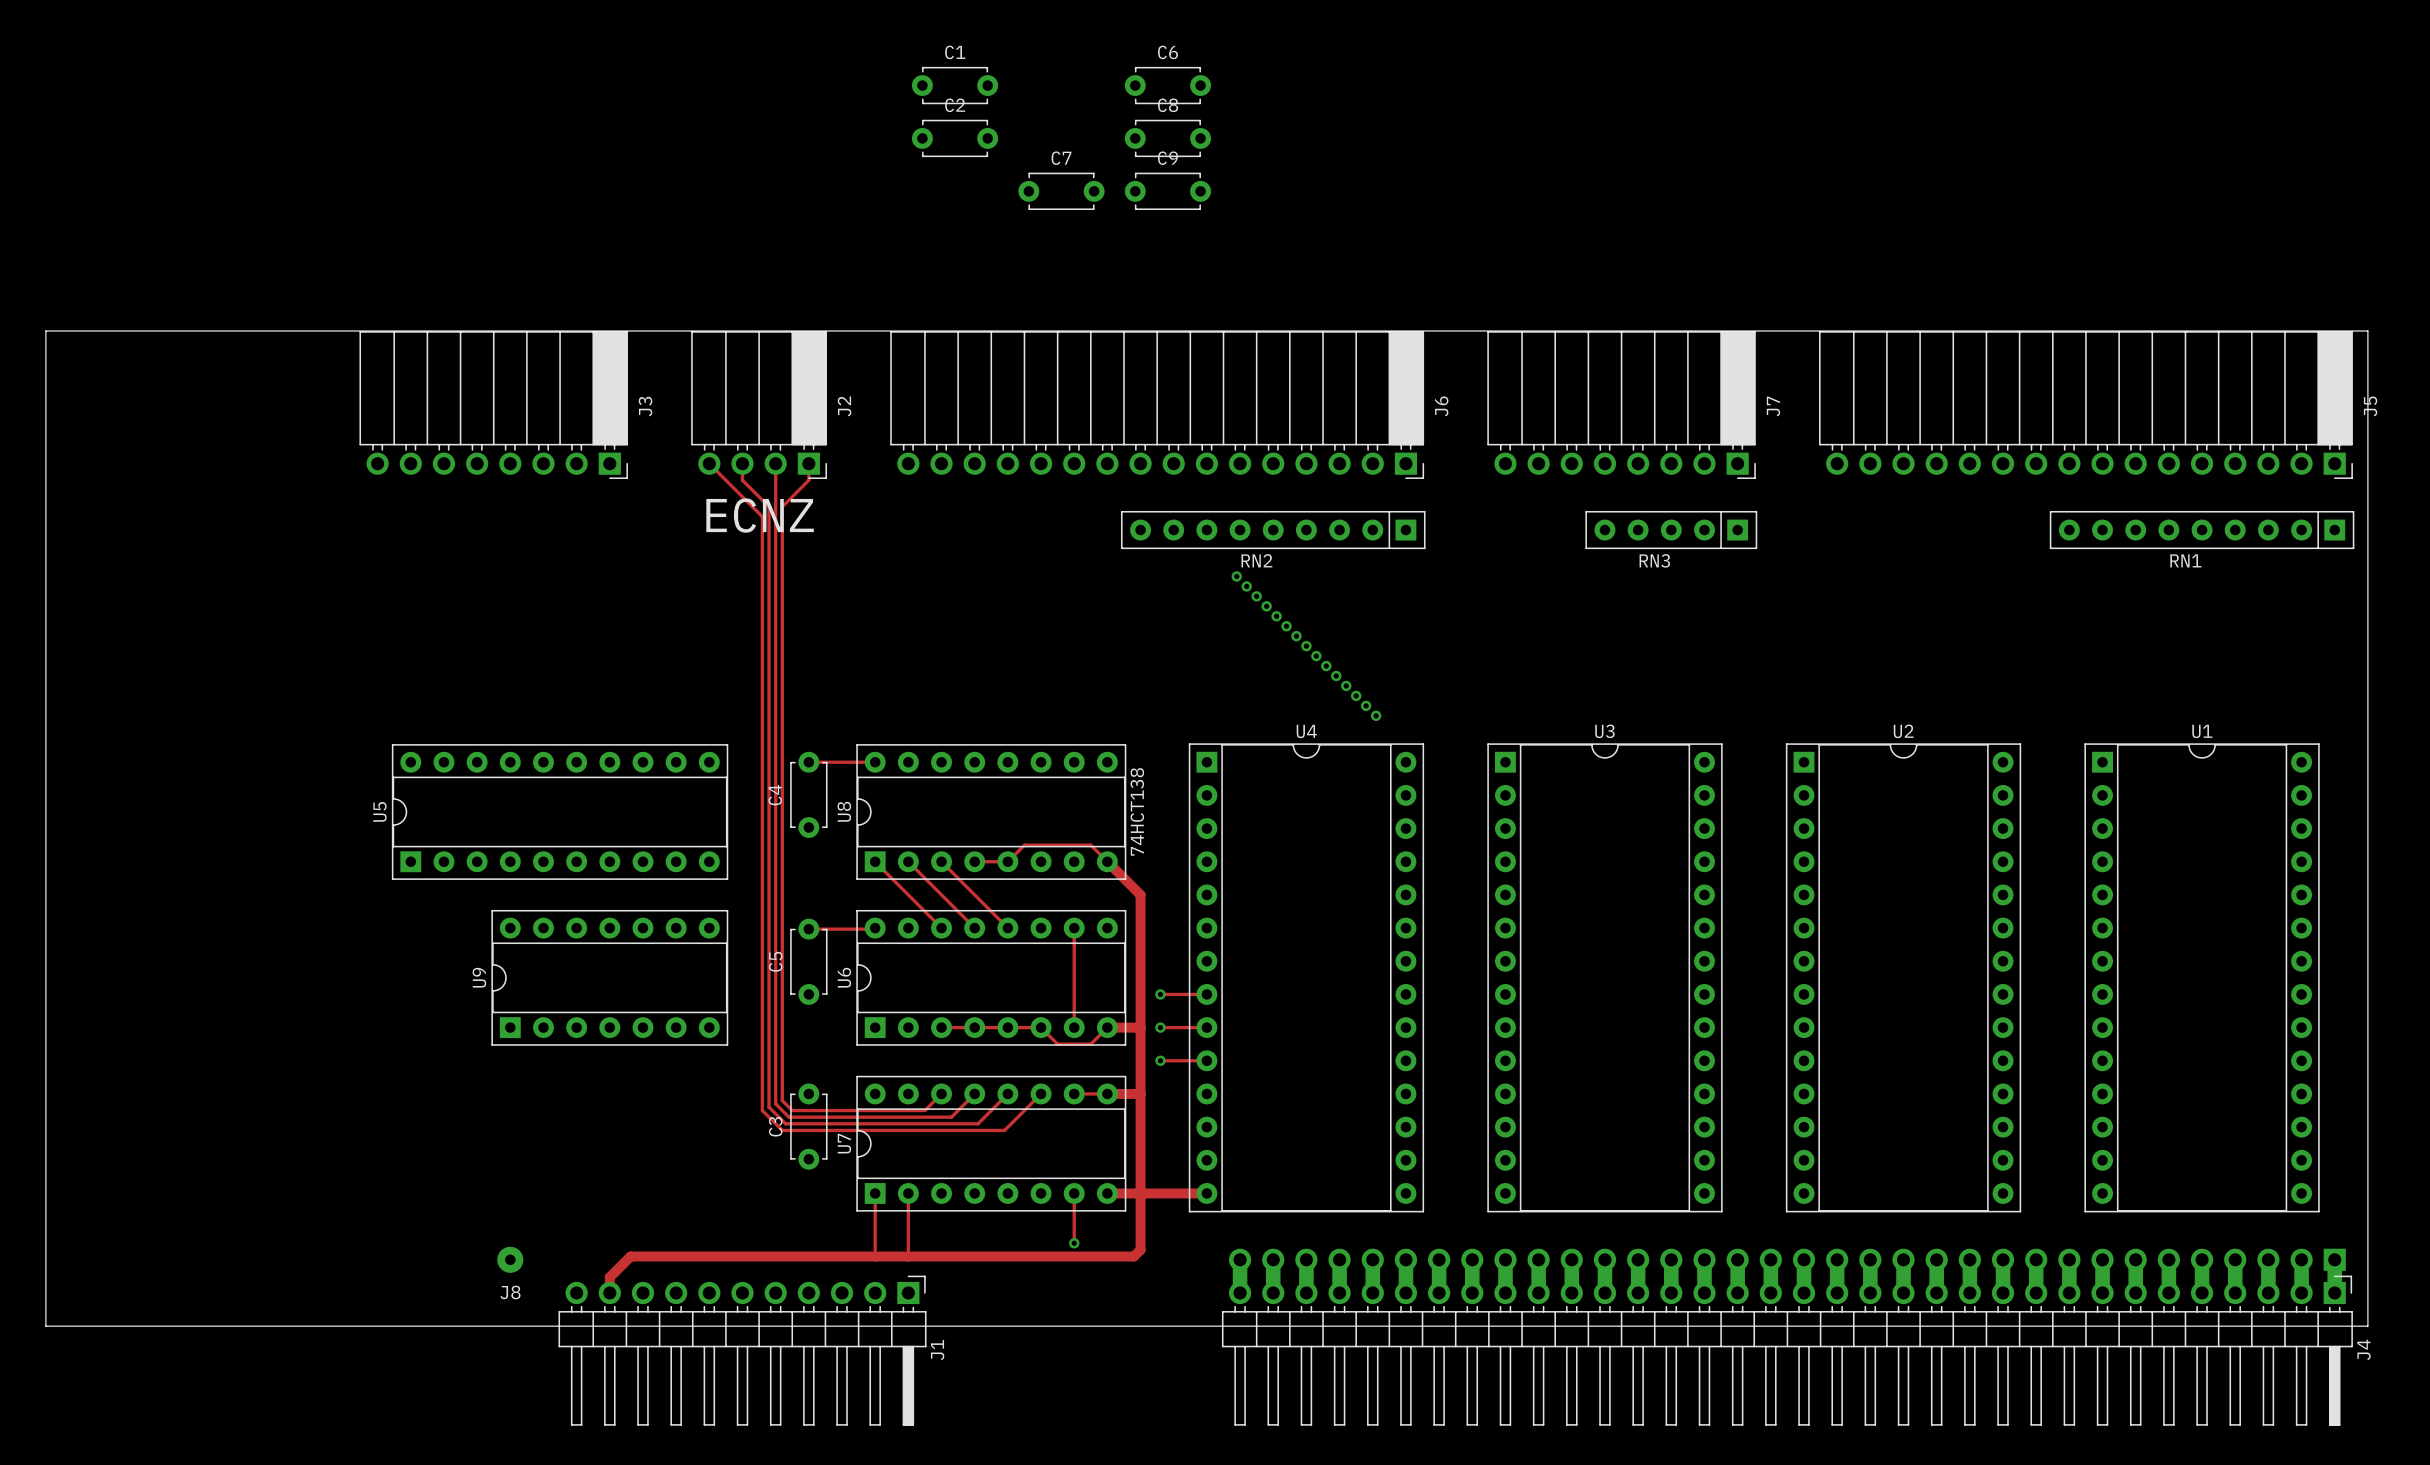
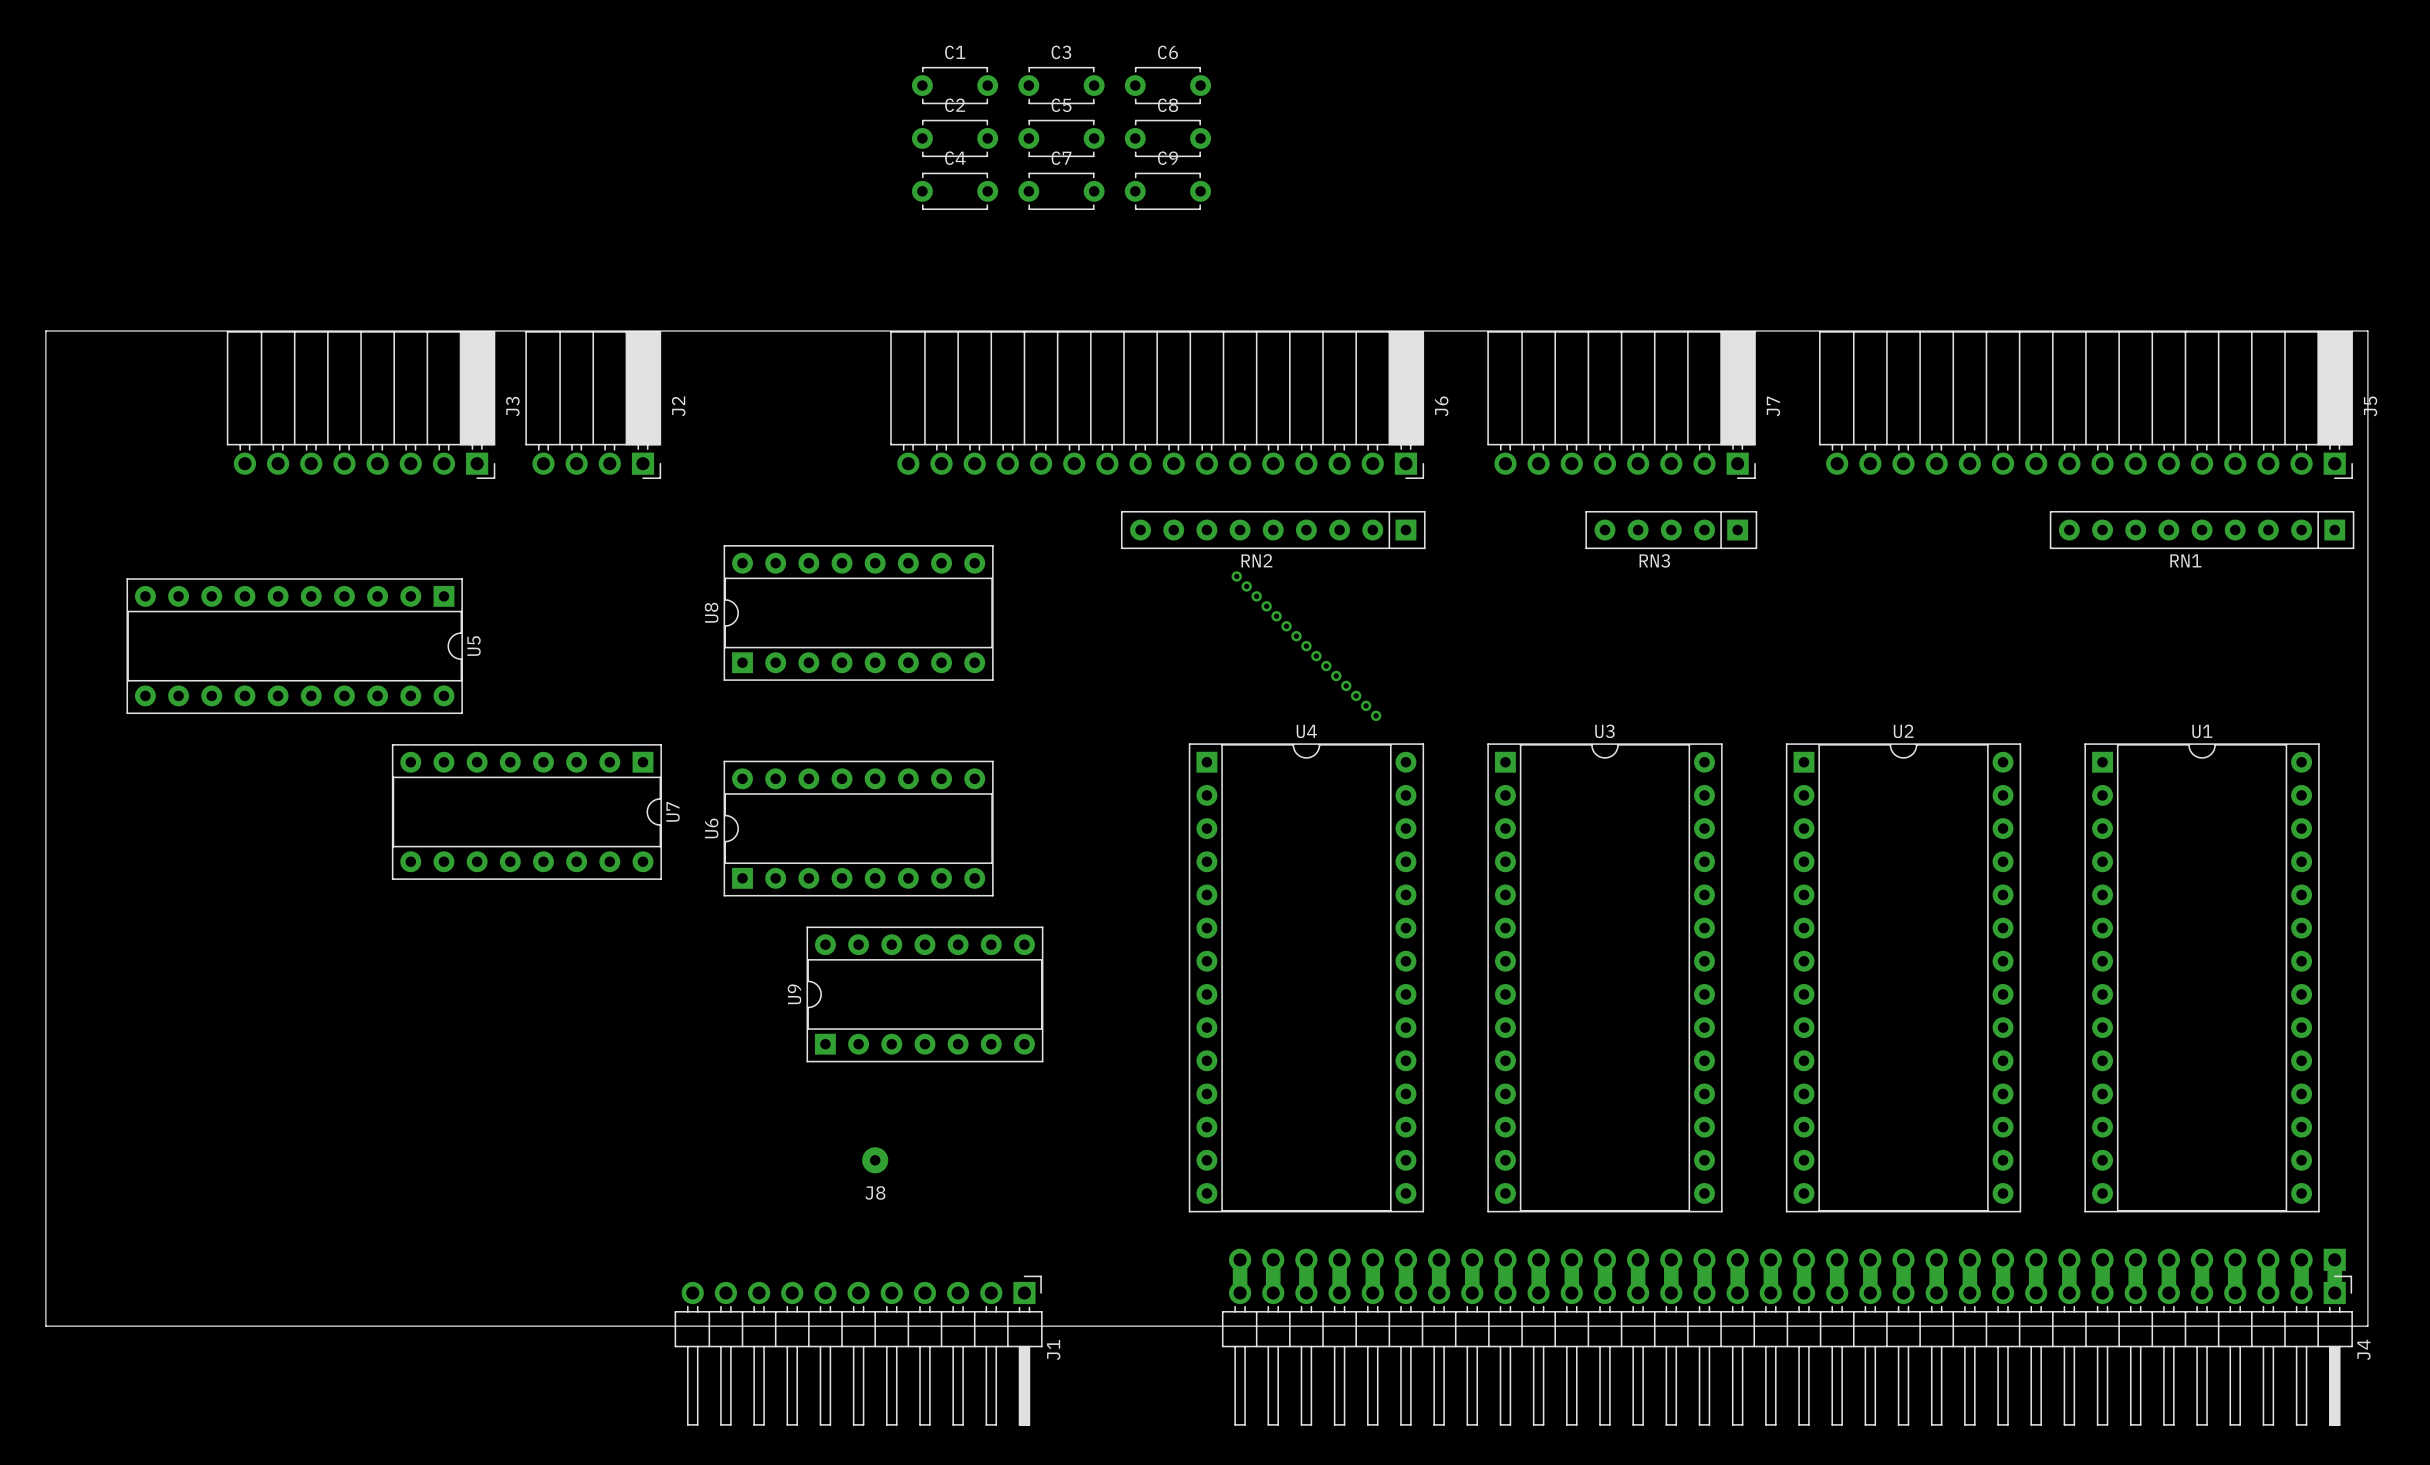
J3 position: (493, 405) -> (361, 405)
J2 position: (759, 405) -> (593, 405)
track: (709, 463) (762, 516) (762, 1110) (782, 1130) (1004, 1130) (1041, 1093) -> none
track: (742, 463) (742, 480) (769, 506) (769, 1107) (785, 1123) (978, 1123) (1007, 1093) -> none
track: (775, 463) (775, 1103) (788, 1117) (951, 1117) (974, 1093) -> none
track: (808, 463) (808, 480) (782, 506) (782, 1100) (792, 1110) (924, 1110) (941, 1093) -> none
text: ECNZ (760, 515) -> none
track: (808, 762) (875, 762) -> none
C4 rotation: 0° (808, 794) -> 90° clockwise (955, 191)
C4 position: (808, 794) -> (955, 191)
U8 value: 74HCT138 (1137, 811) -> none
U5 rotation: 0° (560, 812) -> 180° (294, 646)
U5 position: (560, 812) -> (294, 646)
U8 position: (991, 812) -> (858, 612)
track: (875, 861) (941, 928) -> none
track: (908, 861) (974, 928) -> none
track: (941, 861) (1007, 928) -> none
track: (974, 861) (1007, 861) (1024, 845) (1090, 845) (1140, 894) (1140, 1249) (1133, 1256) (630, 1256) (609, 1277) (609, 1292) -> none
track: (875, 928) (808, 929) -> none
track: (1074, 928) (1074, 1027) -> none
C5 rotation: 0° (808, 961) -> 90° clockwise (1061, 138)
C5 position: (808, 961) -> (1061, 138)
U9 position: (609, 977) -> (924, 994)
U6 position: (991, 977) -> (858, 828)
via: (1160, 994) -> none
track: (1161, 994) (1206, 994) -> none
track: (941, 1027) (1041, 1027) (1057, 1044) (1090, 1044) (1107, 1027) (1140, 1027) -> none
track: (1160, 1027) (1206, 1027) -> none
via: (1160, 1027) -> none
track: (1160, 1060) (1206, 1060) -> none
via: (1160, 1060) -> none
track: (1074, 1093) (1140, 1093) -> none
C3 rotation: 0° (808, 1126) -> 90° clockwise (1061, 85)
C3 position: (808, 1126) -> (1061, 85)
U7 rotation: 0° (991, 1143) -> 180° (526, 812)
U7 position: (991, 1143) -> (526, 812)
track: (875, 1193) (875, 1256) -> none
track: (908, 1193) (908, 1256) -> none
track: (1074, 1193) (1074, 1243) -> none
track: (1107, 1193) (1206, 1193) -> none
via: (1074, 1243) -> none
J8 position: (510, 1259) -> (875, 1160)
J1 position: (742, 1350) -> (858, 1350)

